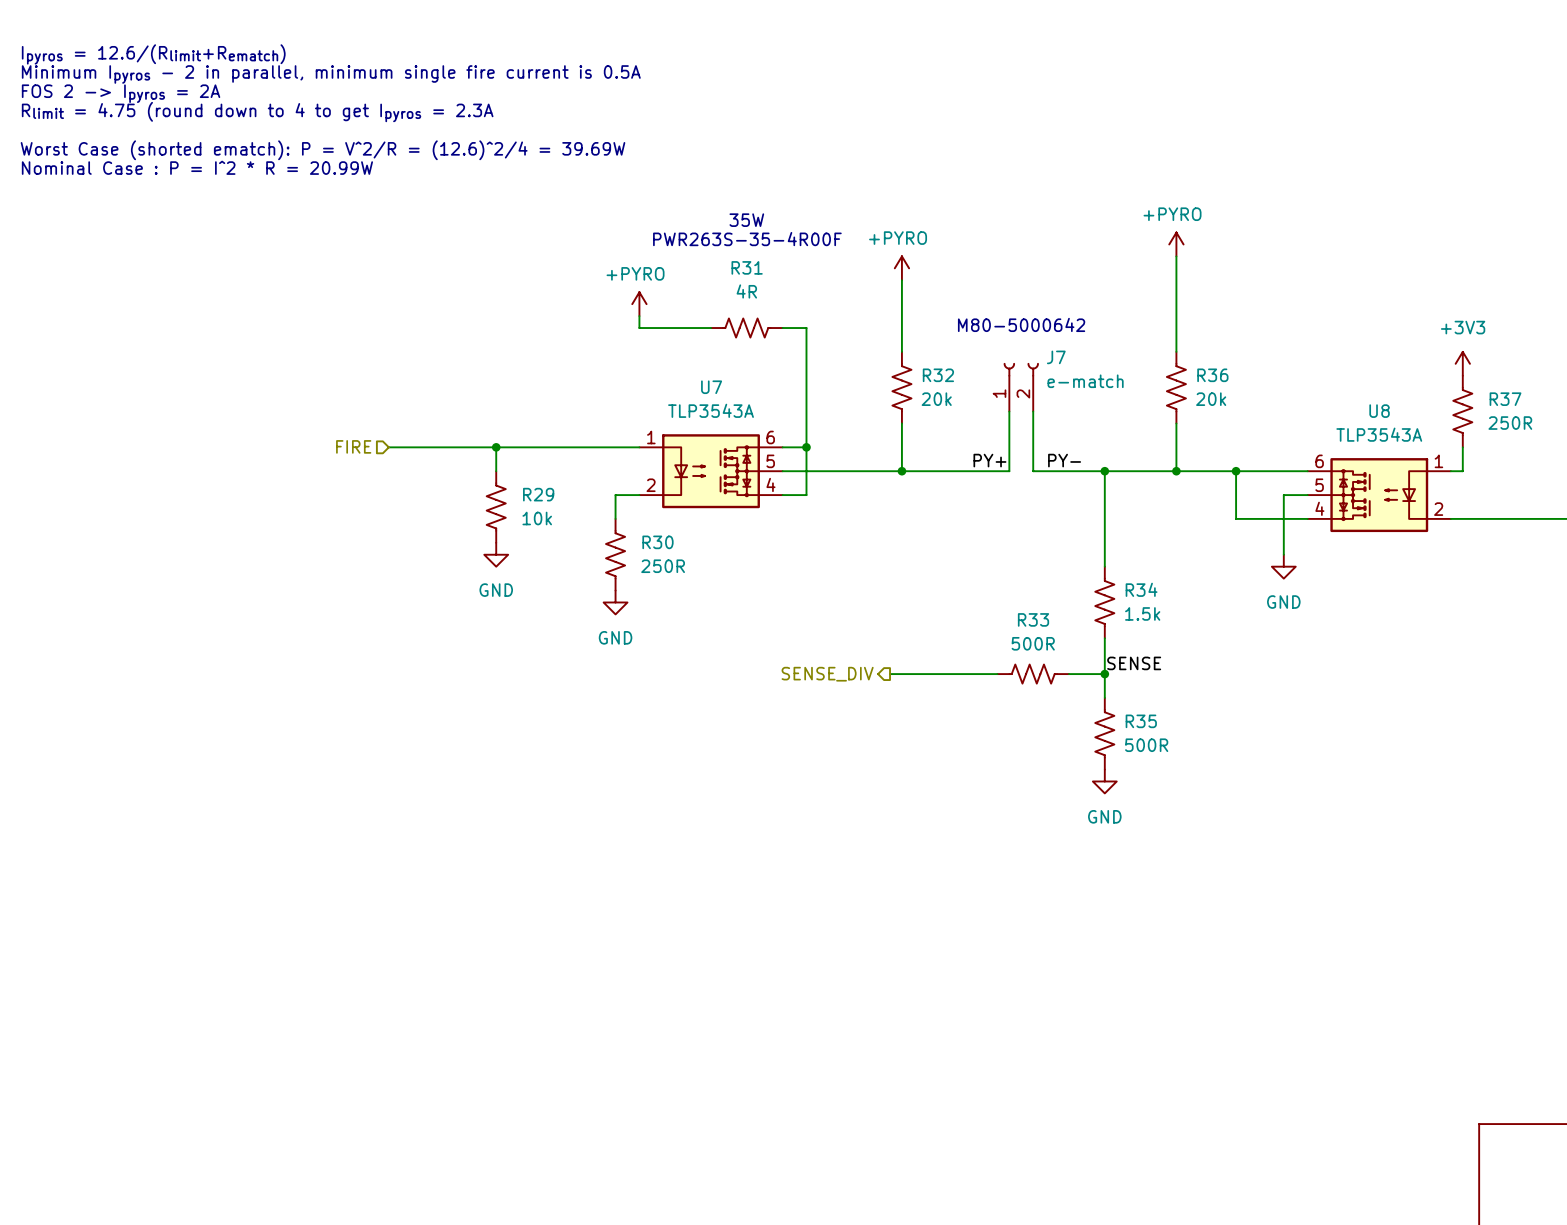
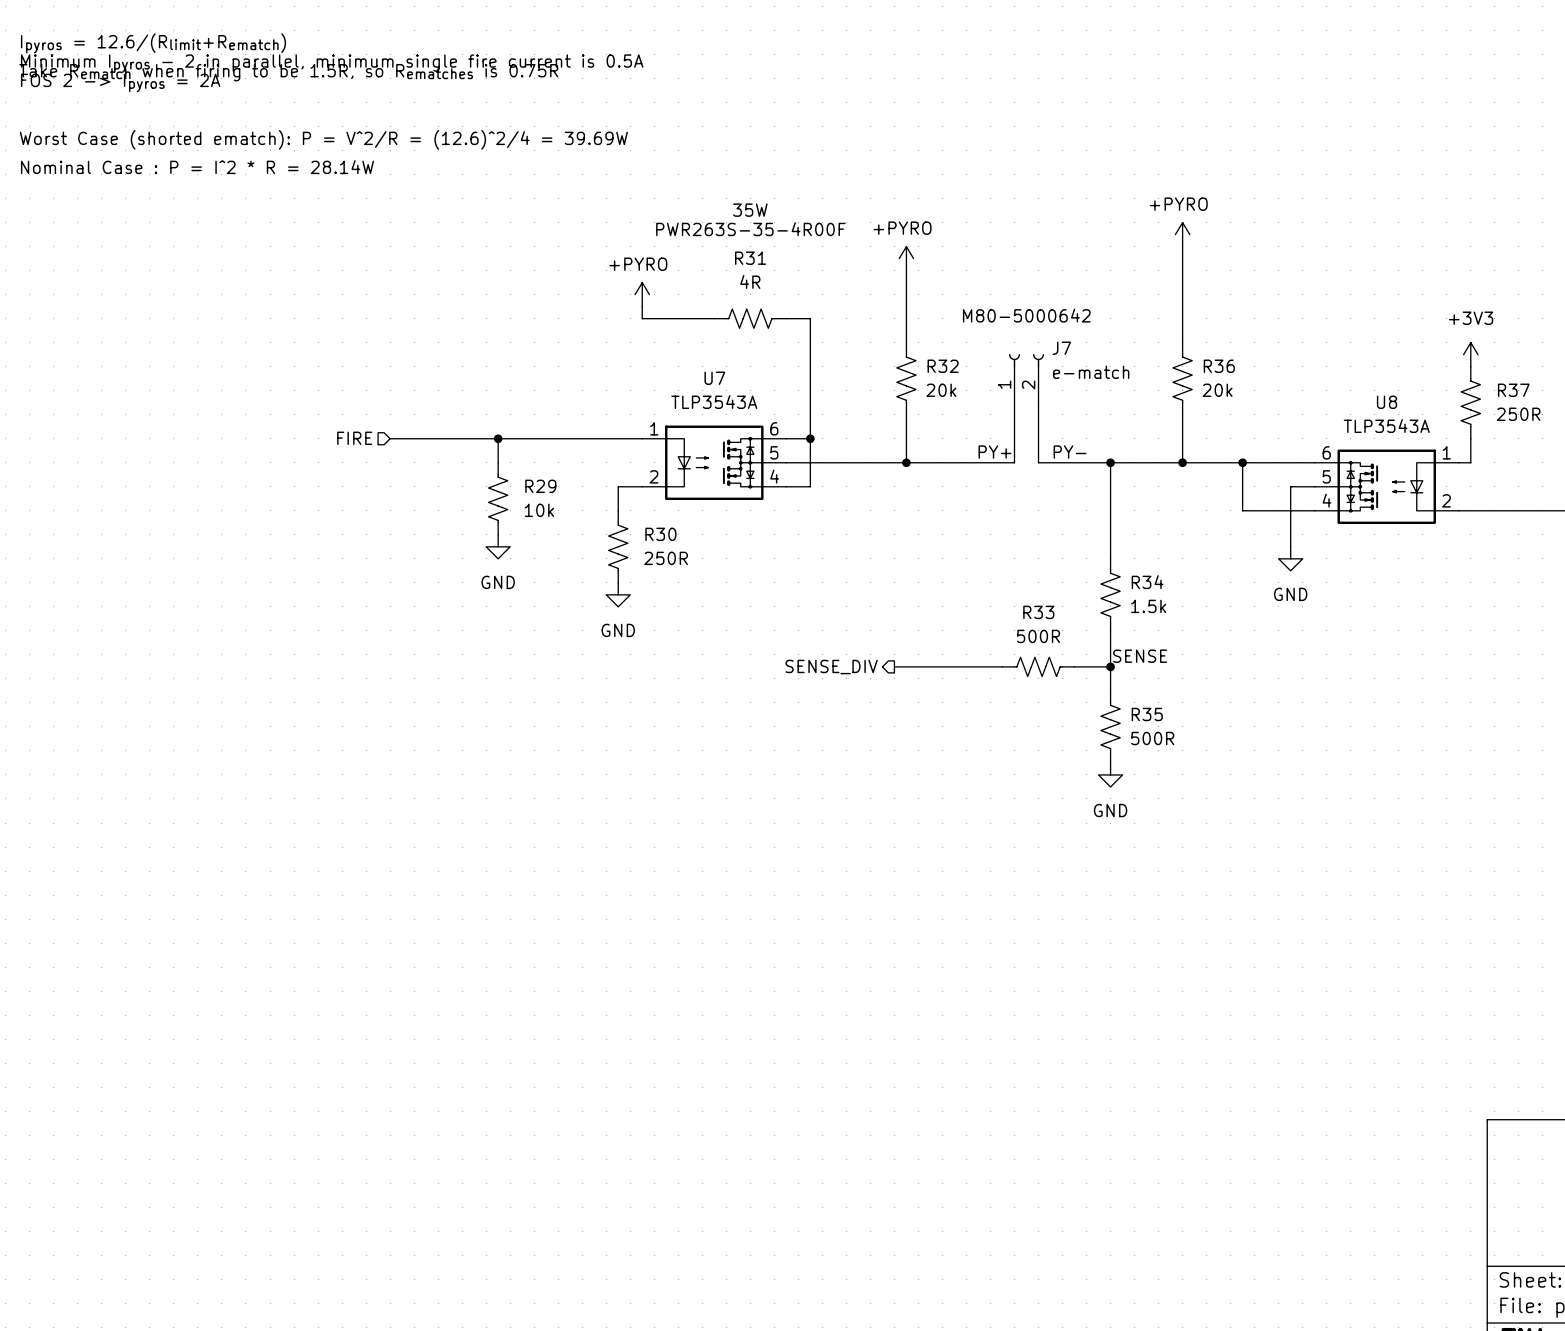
text: none -> Take Rematch when firing to be 1.5R, so Rematches is 0.75R (288, 72)
text: Rlimit = 4.75 (round down to 4 to get Ipyros = 2.3A (257, 112) -> none
text: Nominal Case : P = I^2 * R = 20.99W (197, 167) -> Nominal Case : P = I^2 * R = 28.14W (197, 167)

